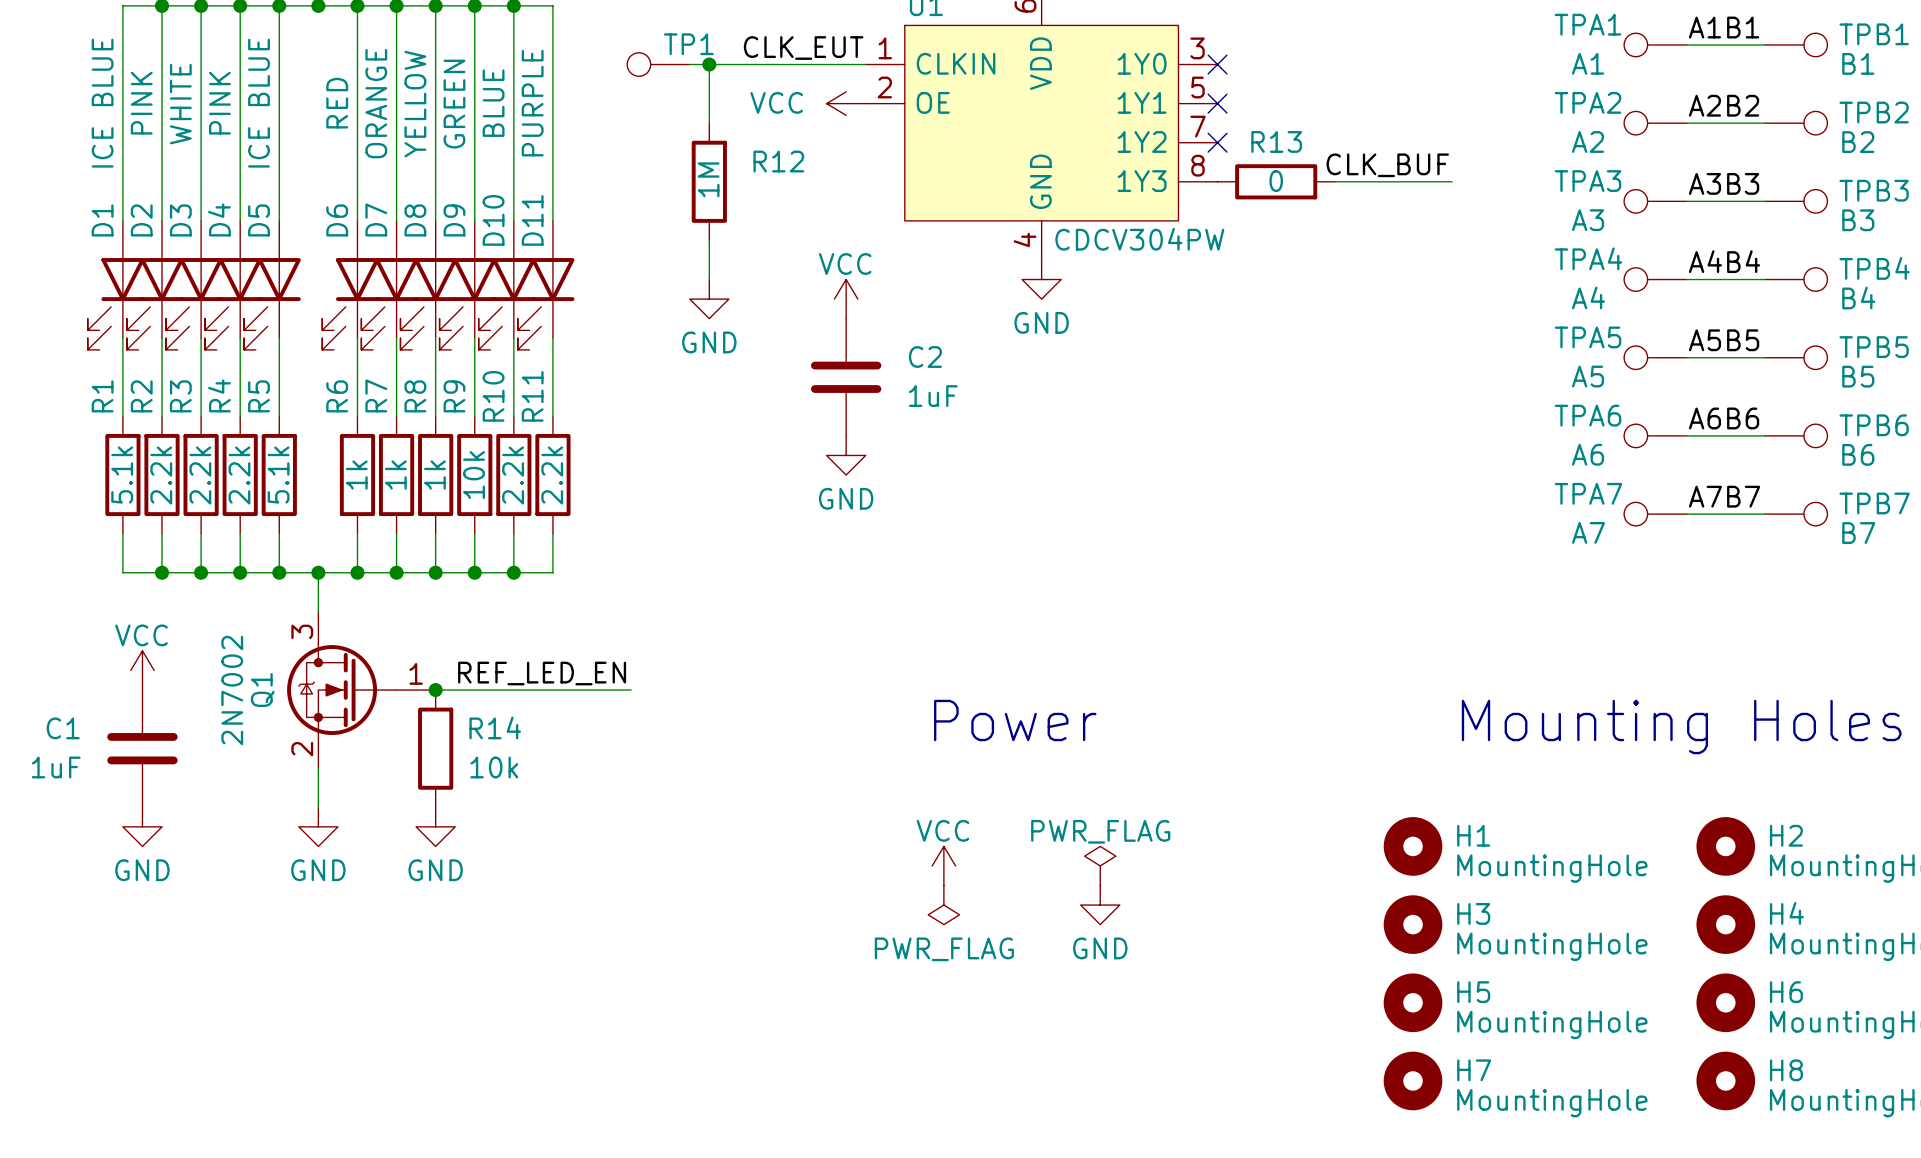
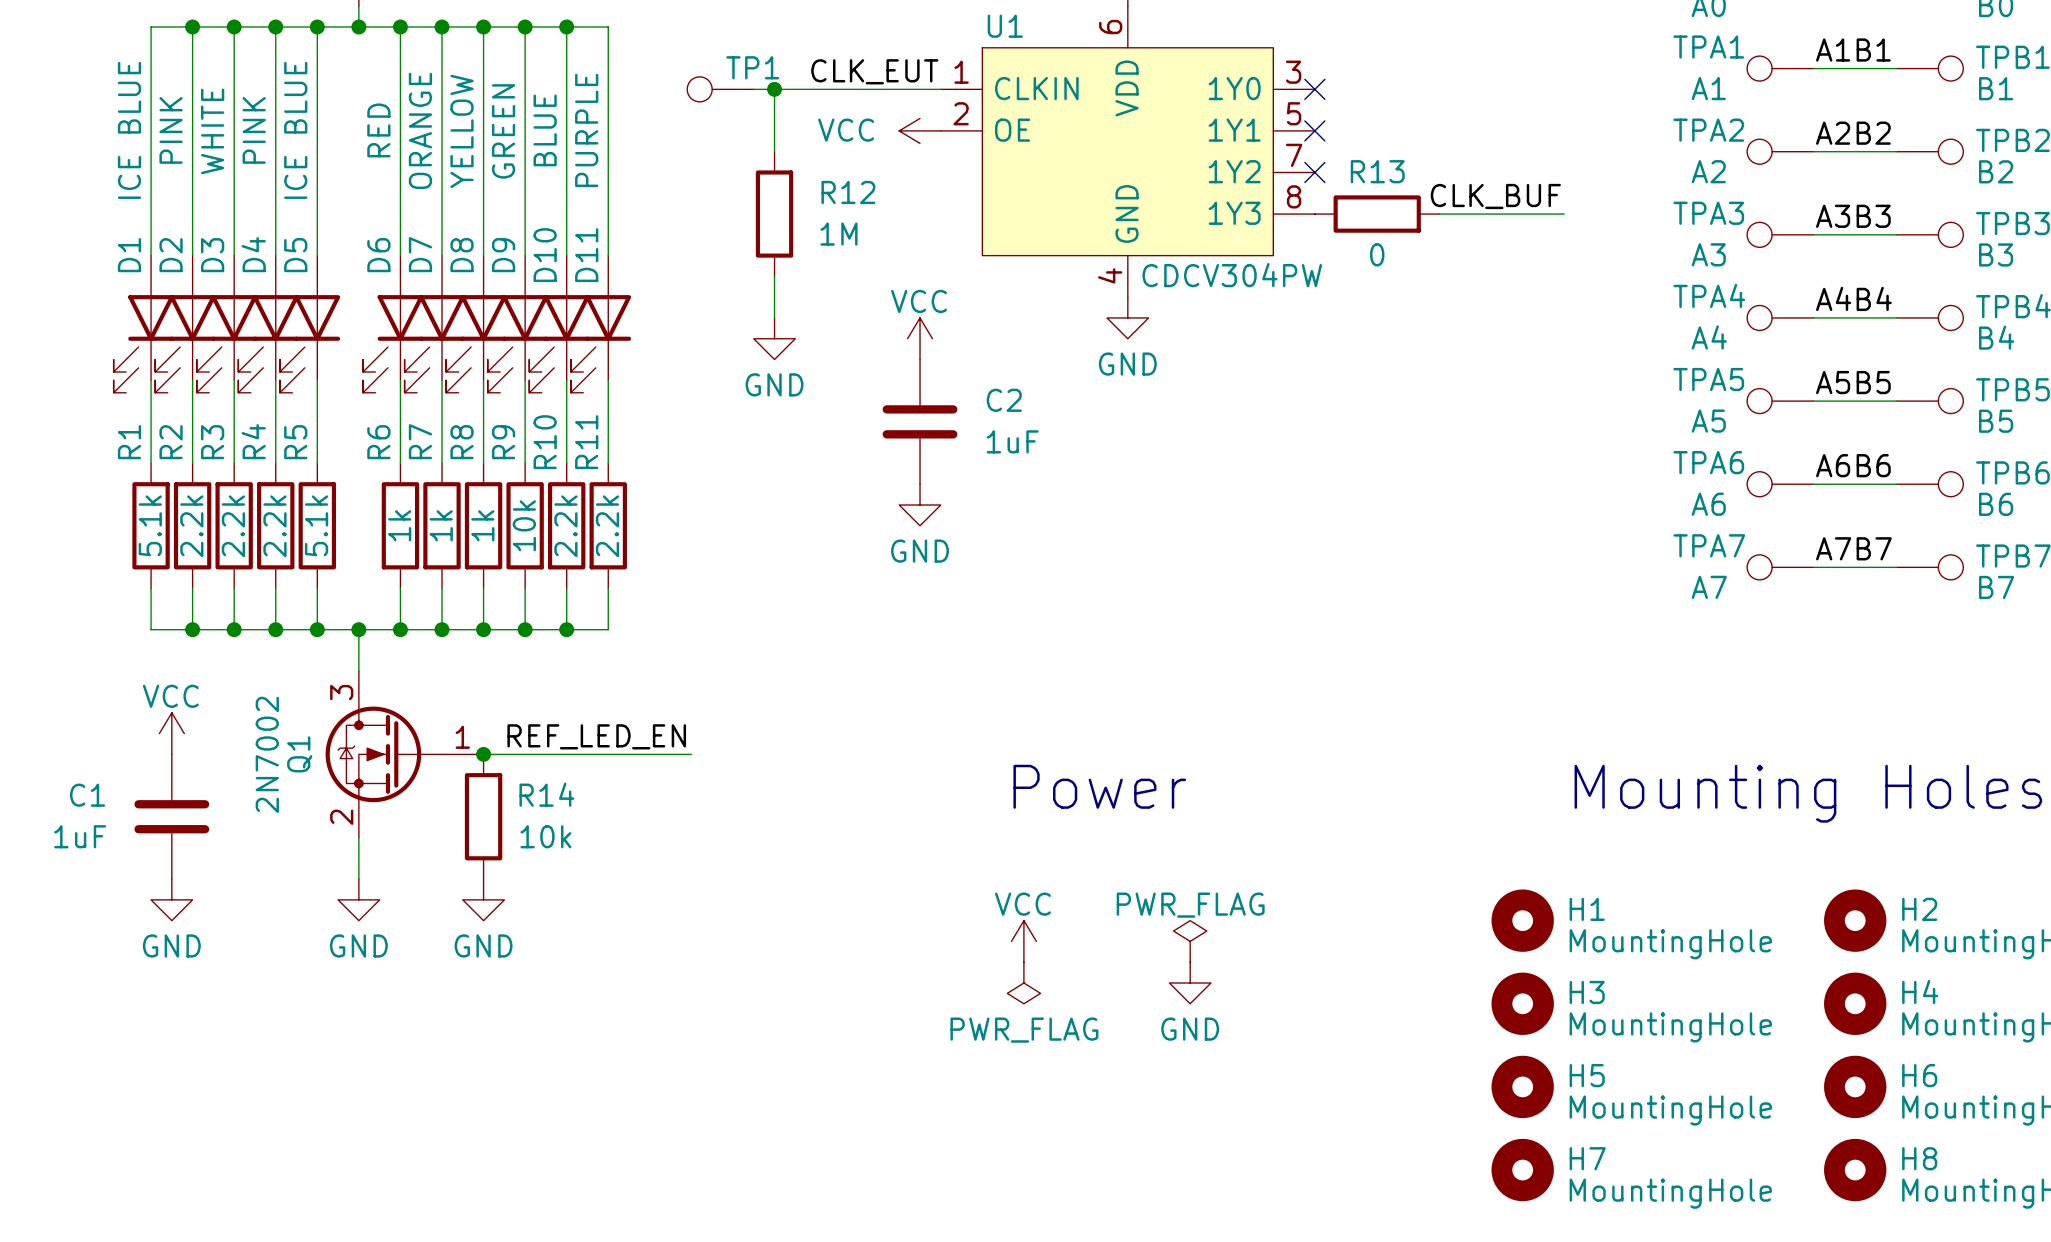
R12 value rotation: 0° (708, 179) -> 90° clockwise (839, 234)
R12 value position: 1M (708, 179) -> 1M (839, 234)
R13 value position: 0 (1276, 181) -> 0 (1377, 254)

